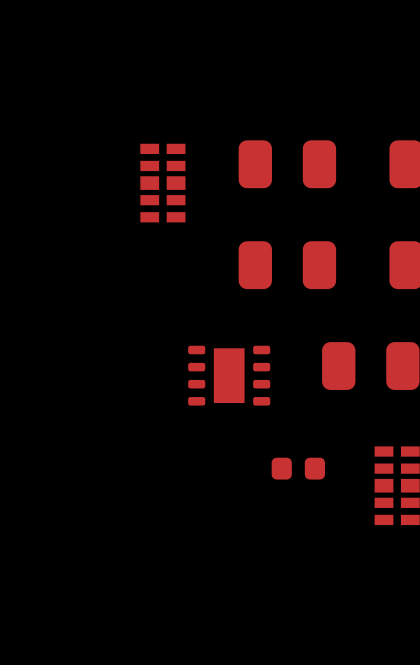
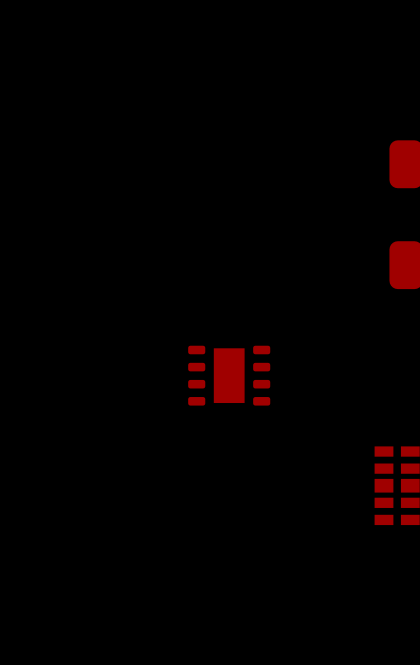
part: (287, 164) -> none
part: (162, 183) -> none
part: (287, 265) -> none
part: (370, 366) -> none
part: (298, 468) -> none

